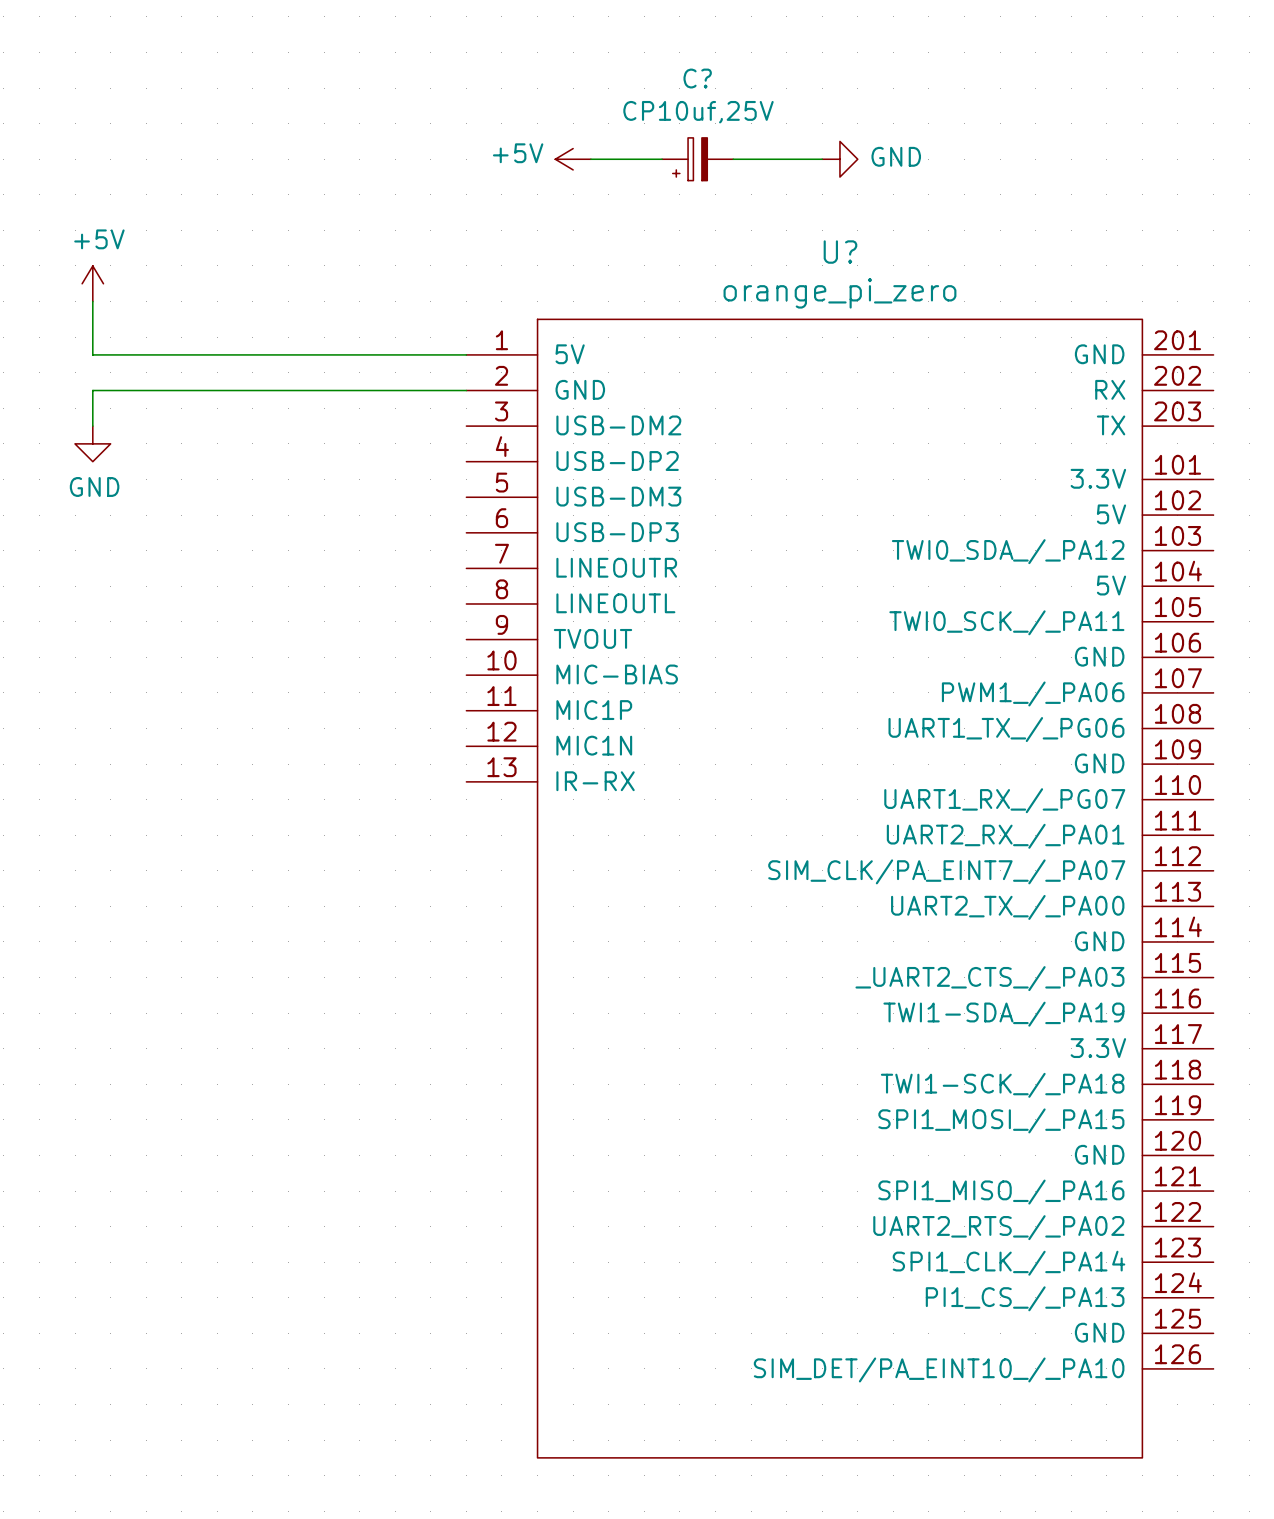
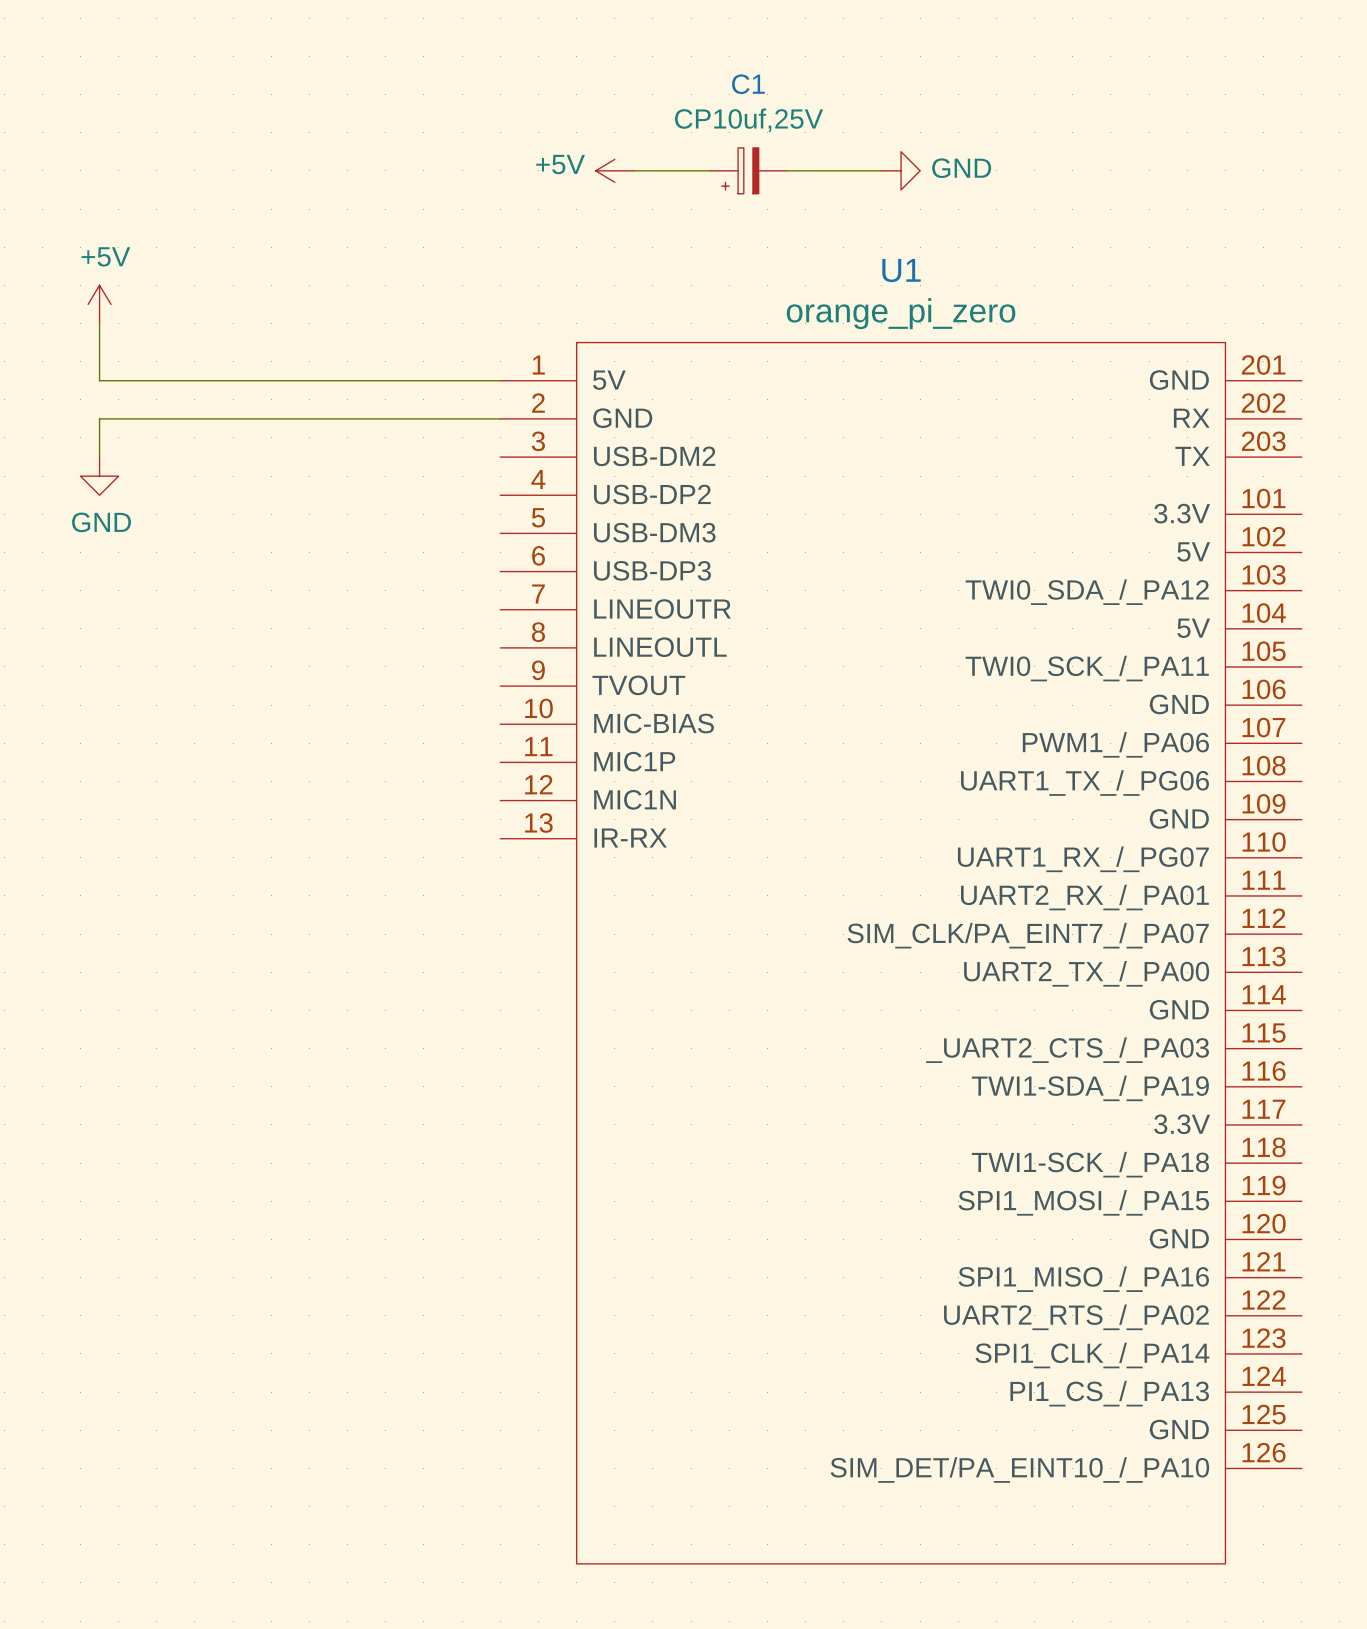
C? name: C? (697, 78) -> C1 (748, 84)
U? name: U? (840, 252) -> U1 (901, 270)

